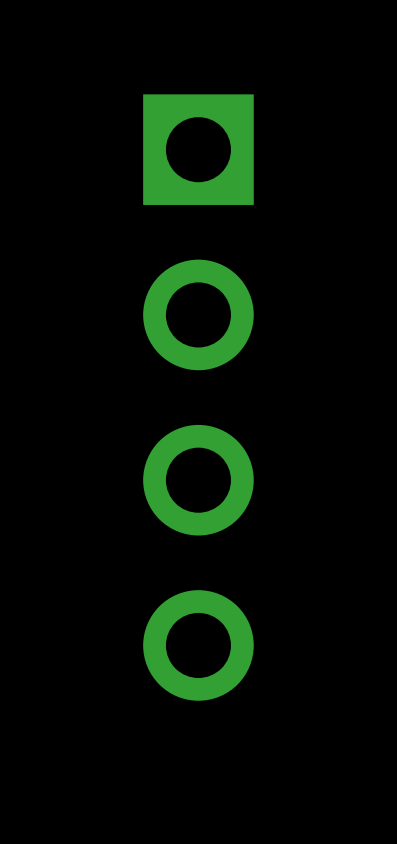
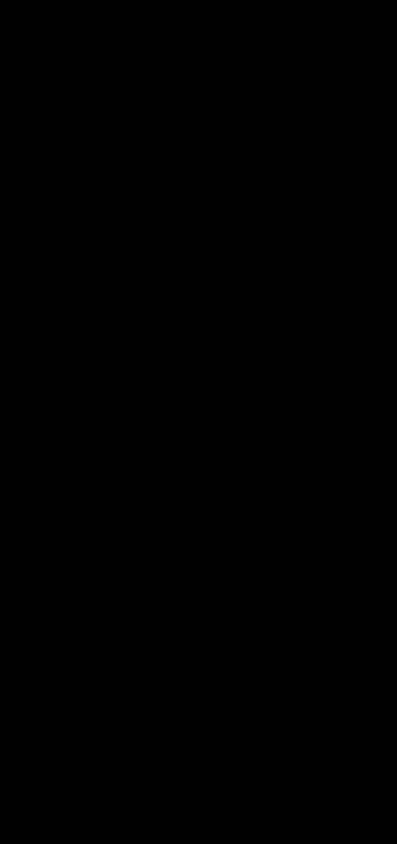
part: (198, 397) -> none

